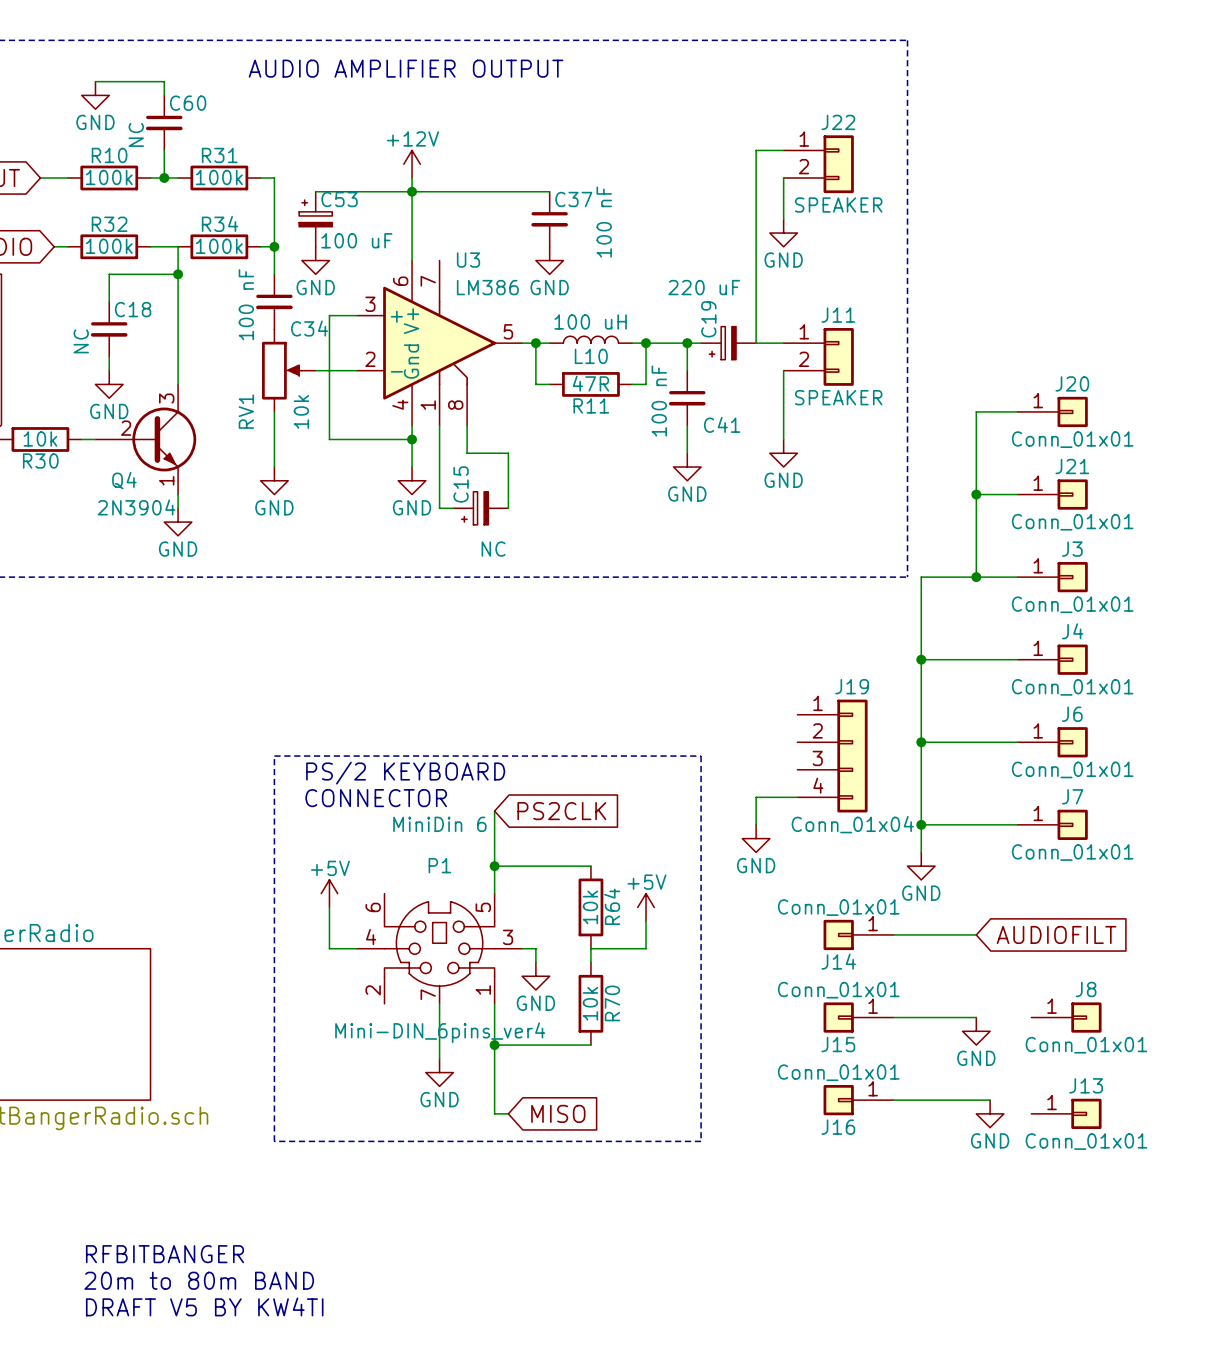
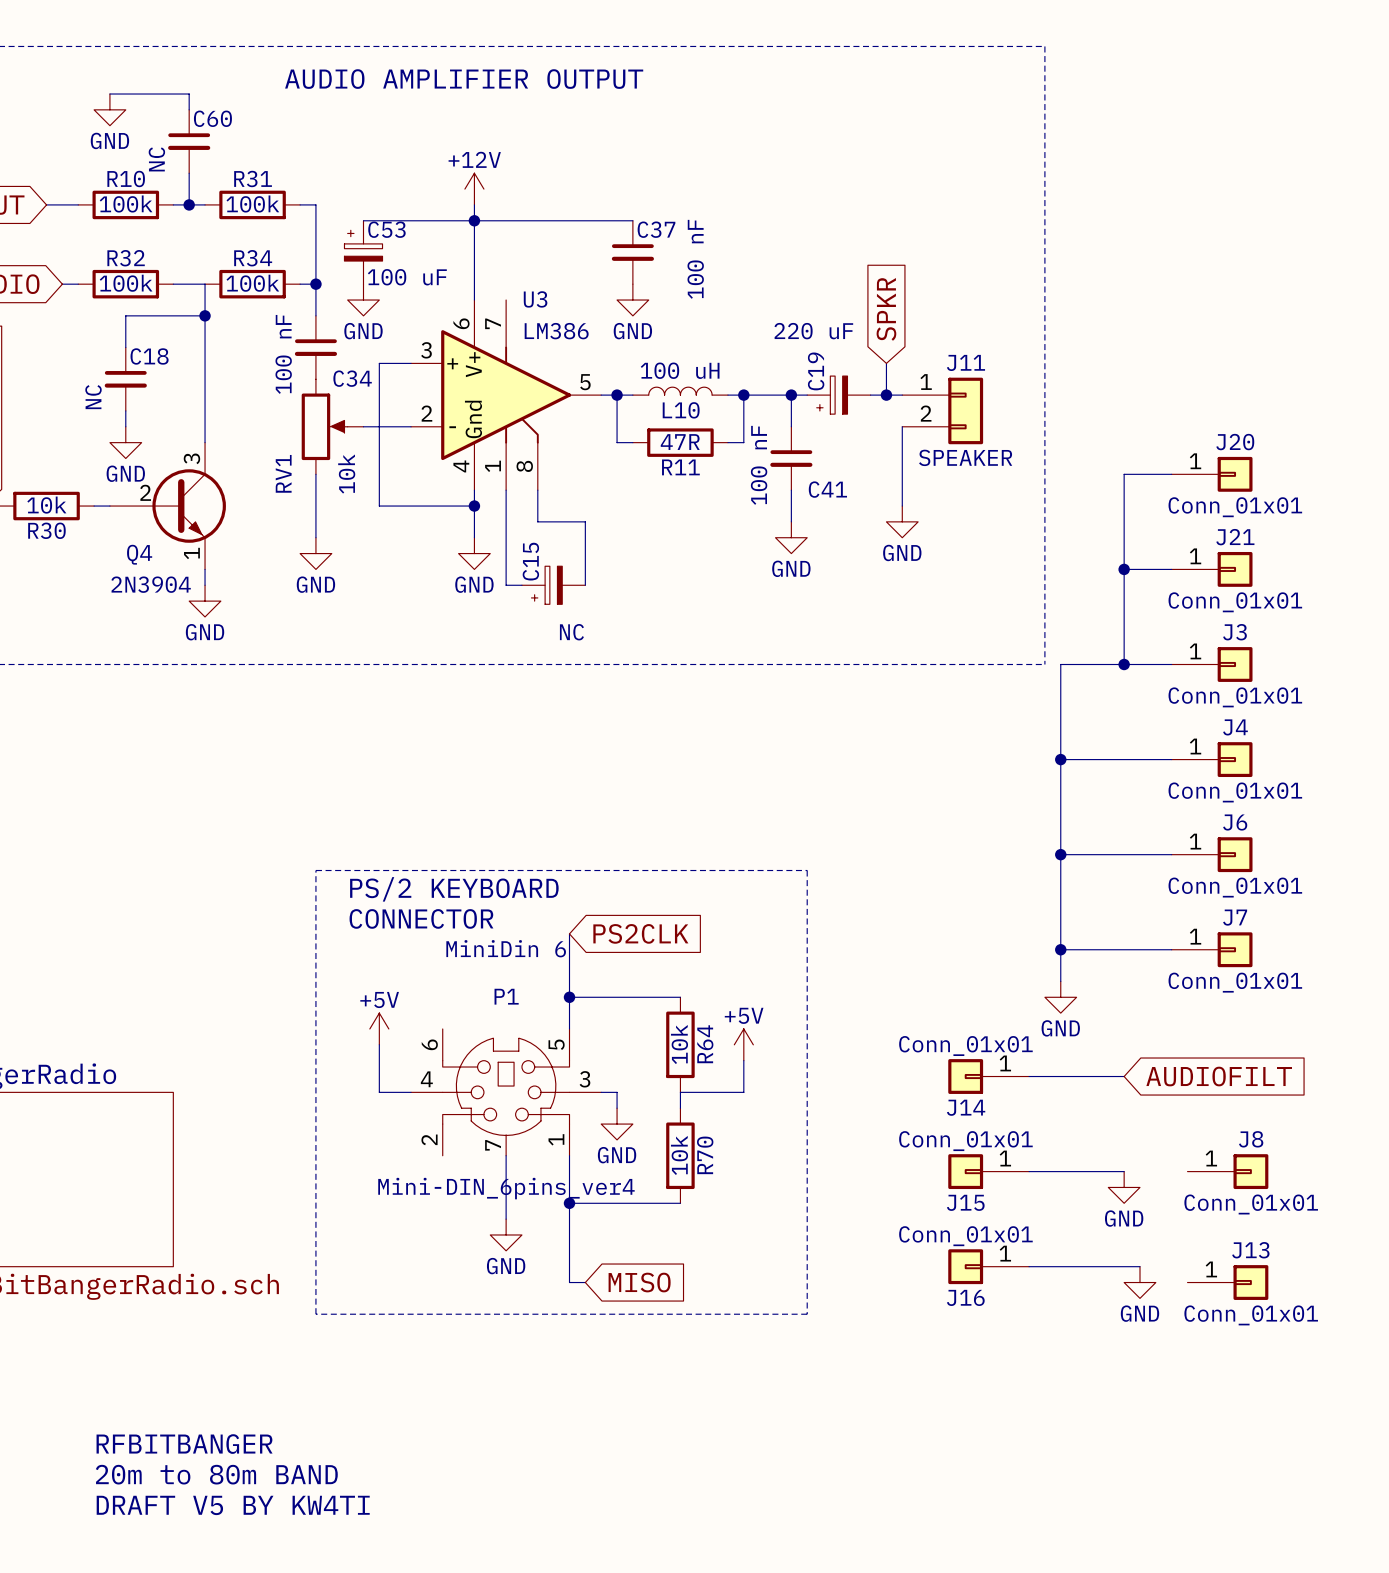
wire: (783, 150) (756, 150) (756, 343) -> none
J22: SPEAKER (818, 164) -> none
wire: (783, 177) (783, 219) -> none
power symbol: GND (783, 233) -> none
global label: none -> SPKR (886, 309)
wire: none -> (886, 363) (886, 395)
junction: none -> (886, 395)
J19: Conn_01x04 (832, 756) -> none
wire: (797, 797) (756, 797) (756, 824) -> none
power symbol: GND (756, 838) -> none

